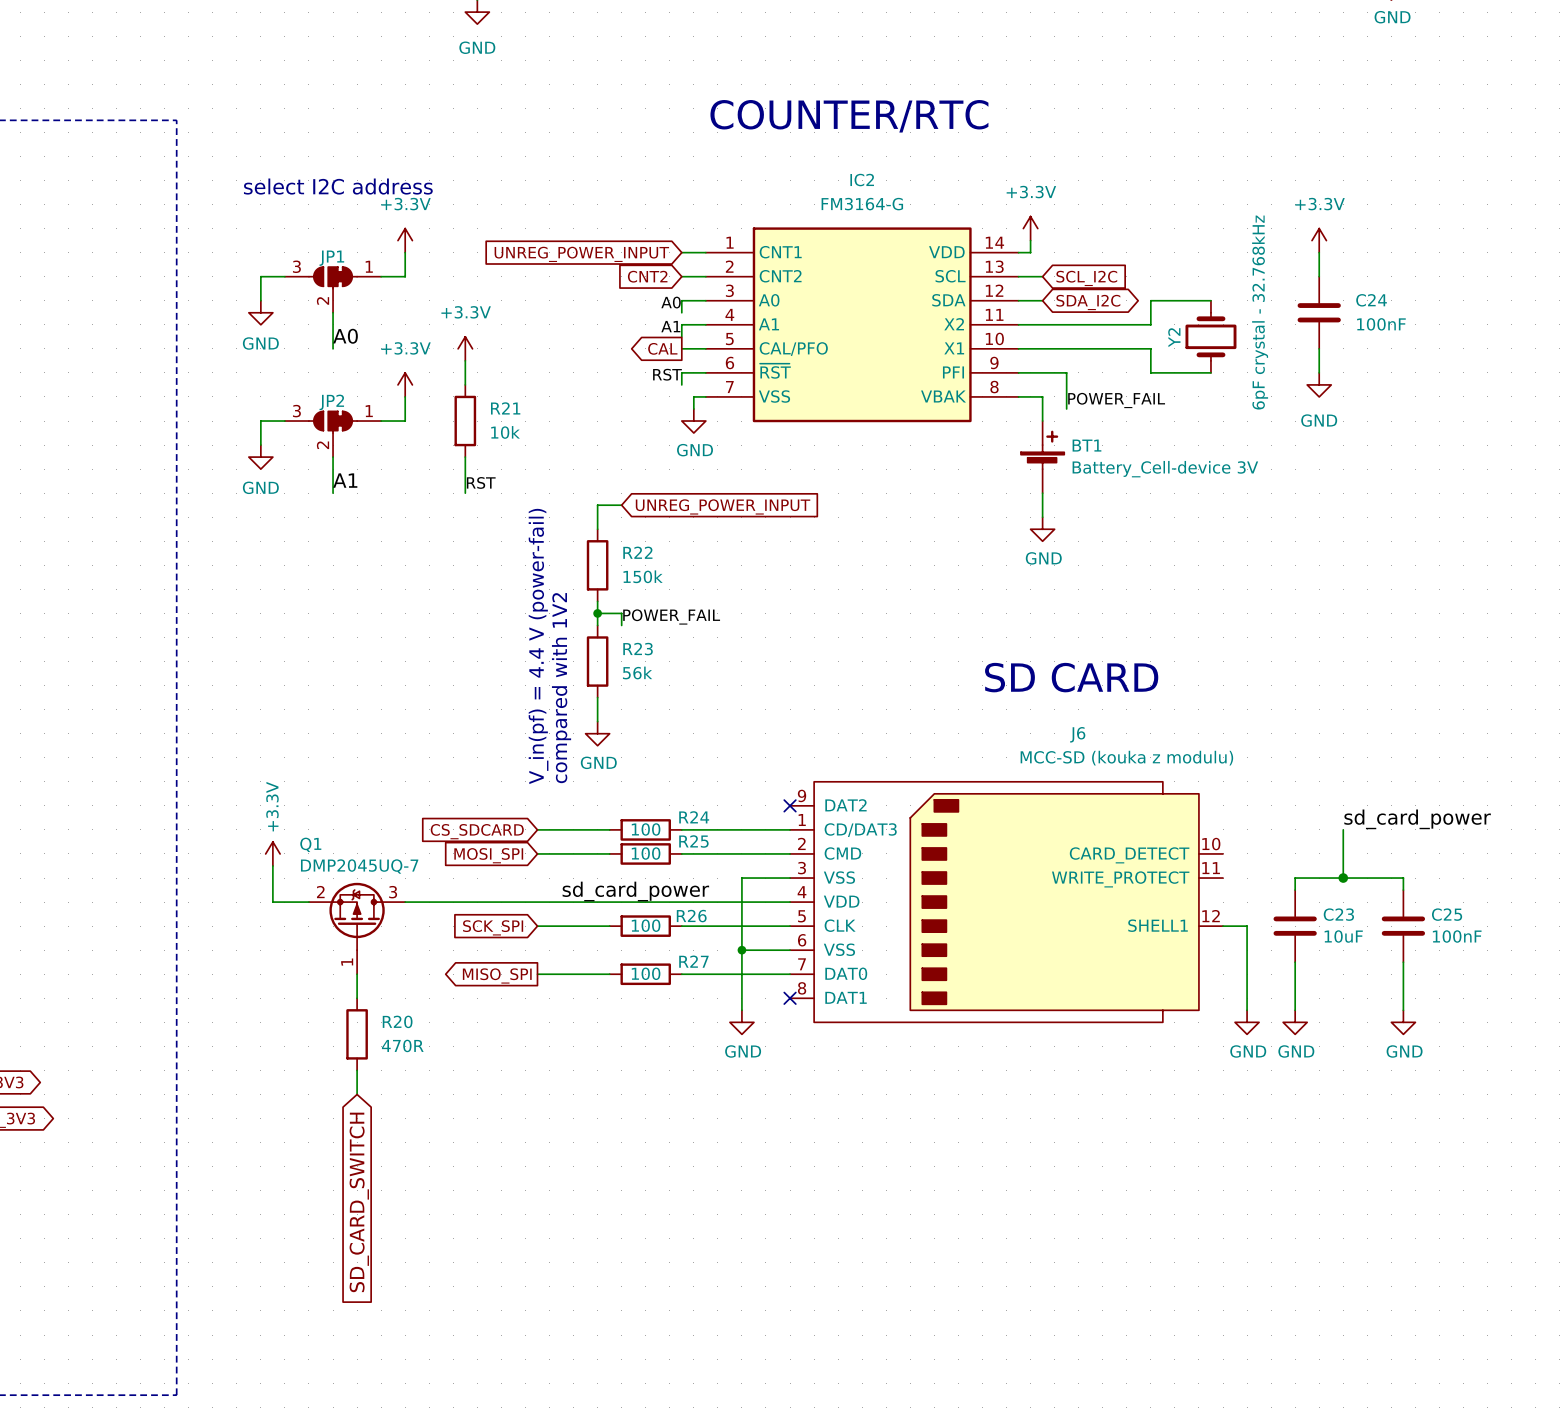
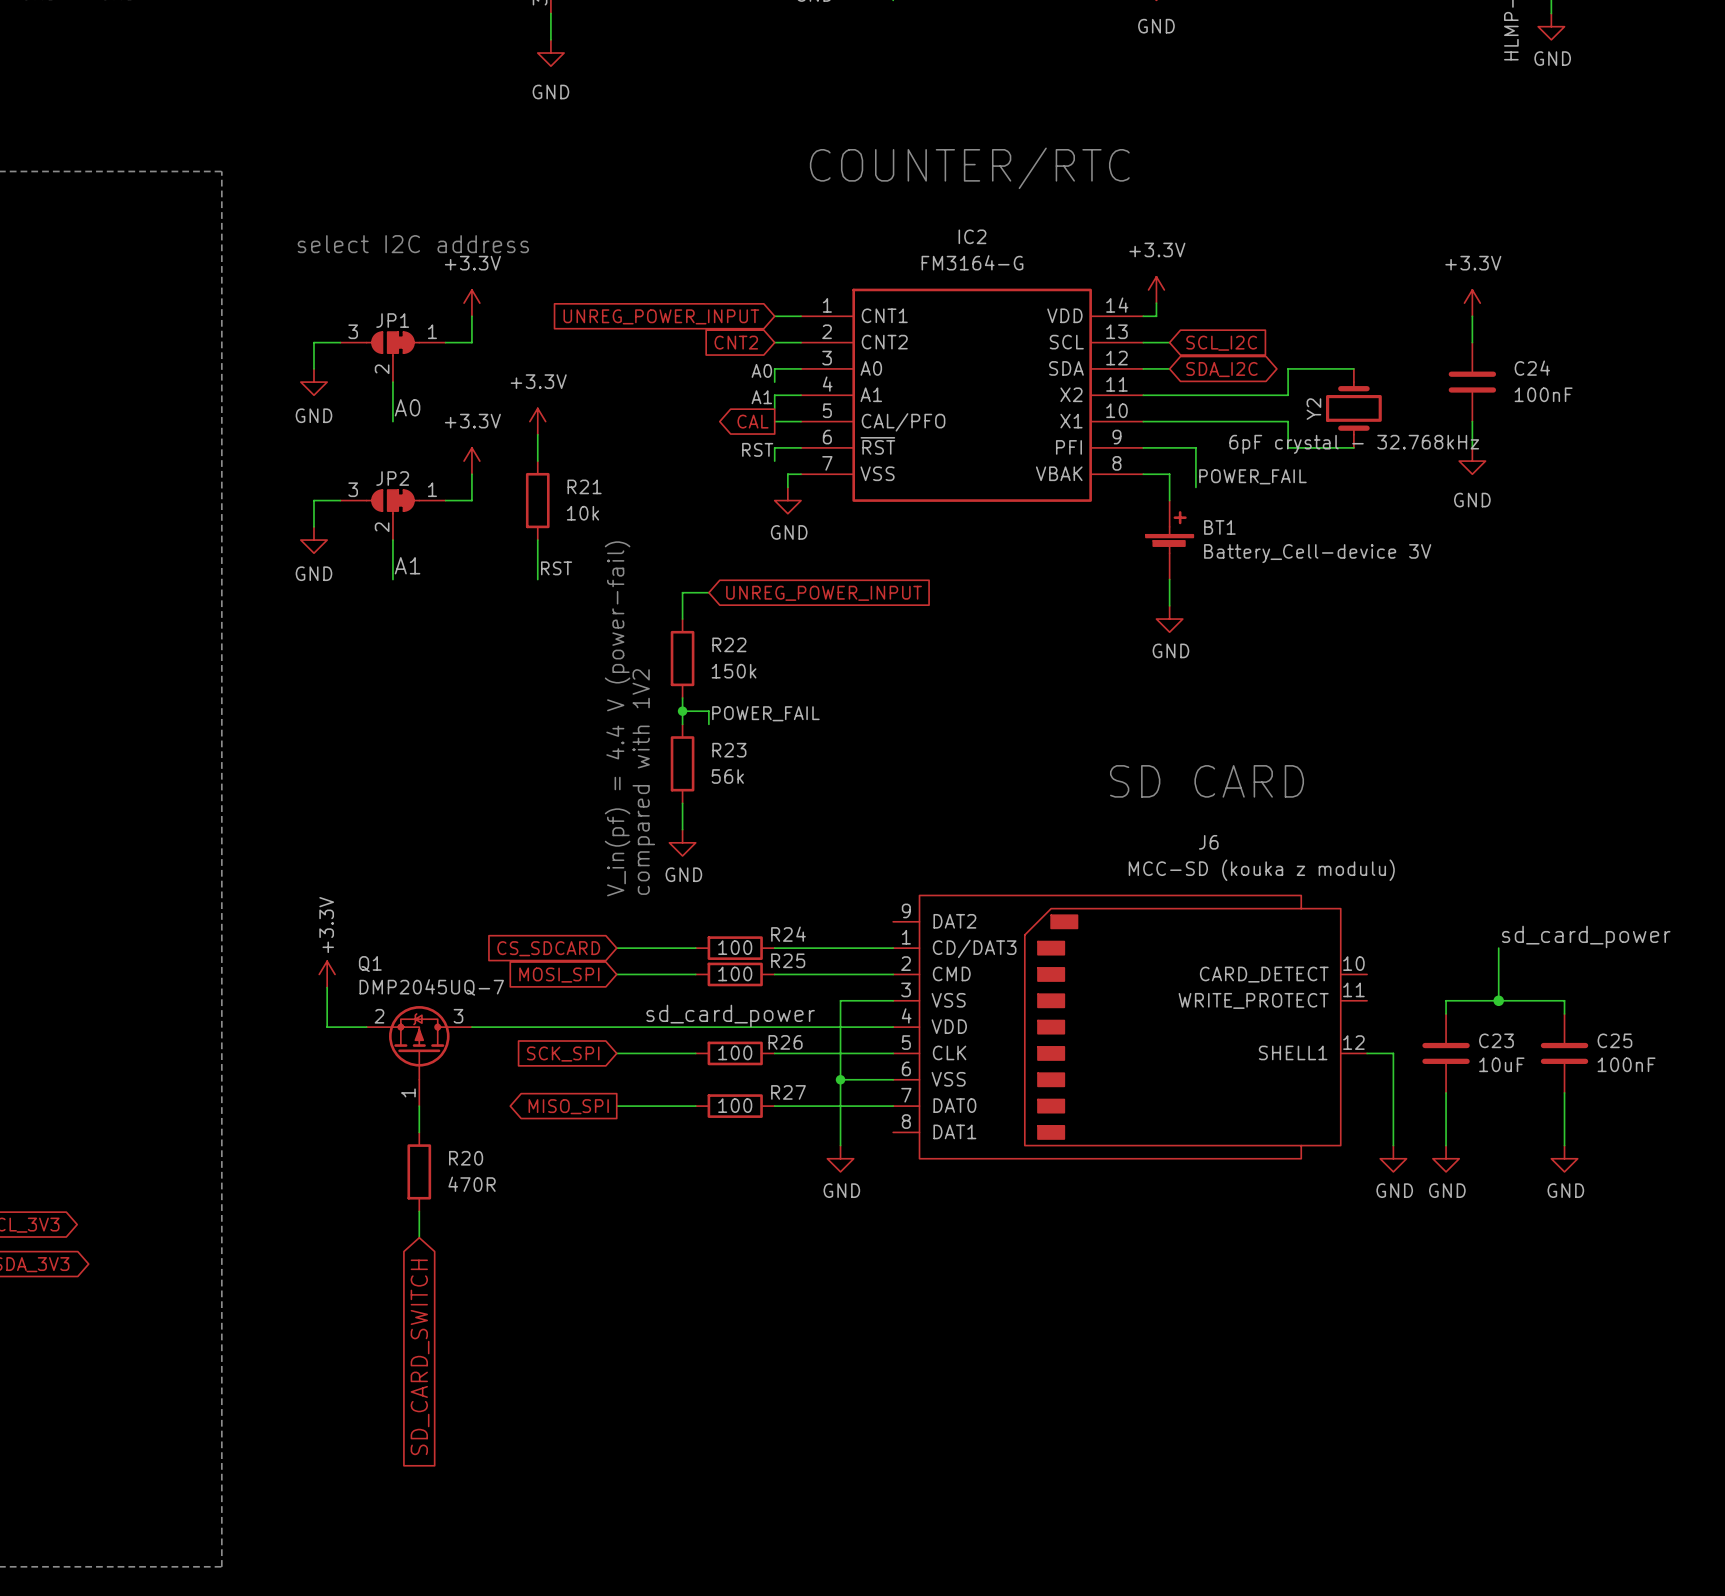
Y2 value rotation: 0° (1260, 312) -> 90° clockwise (1354, 444)
no-connect mark: (790, 805) -> none
no-connect mark: (790, 998) -> none

